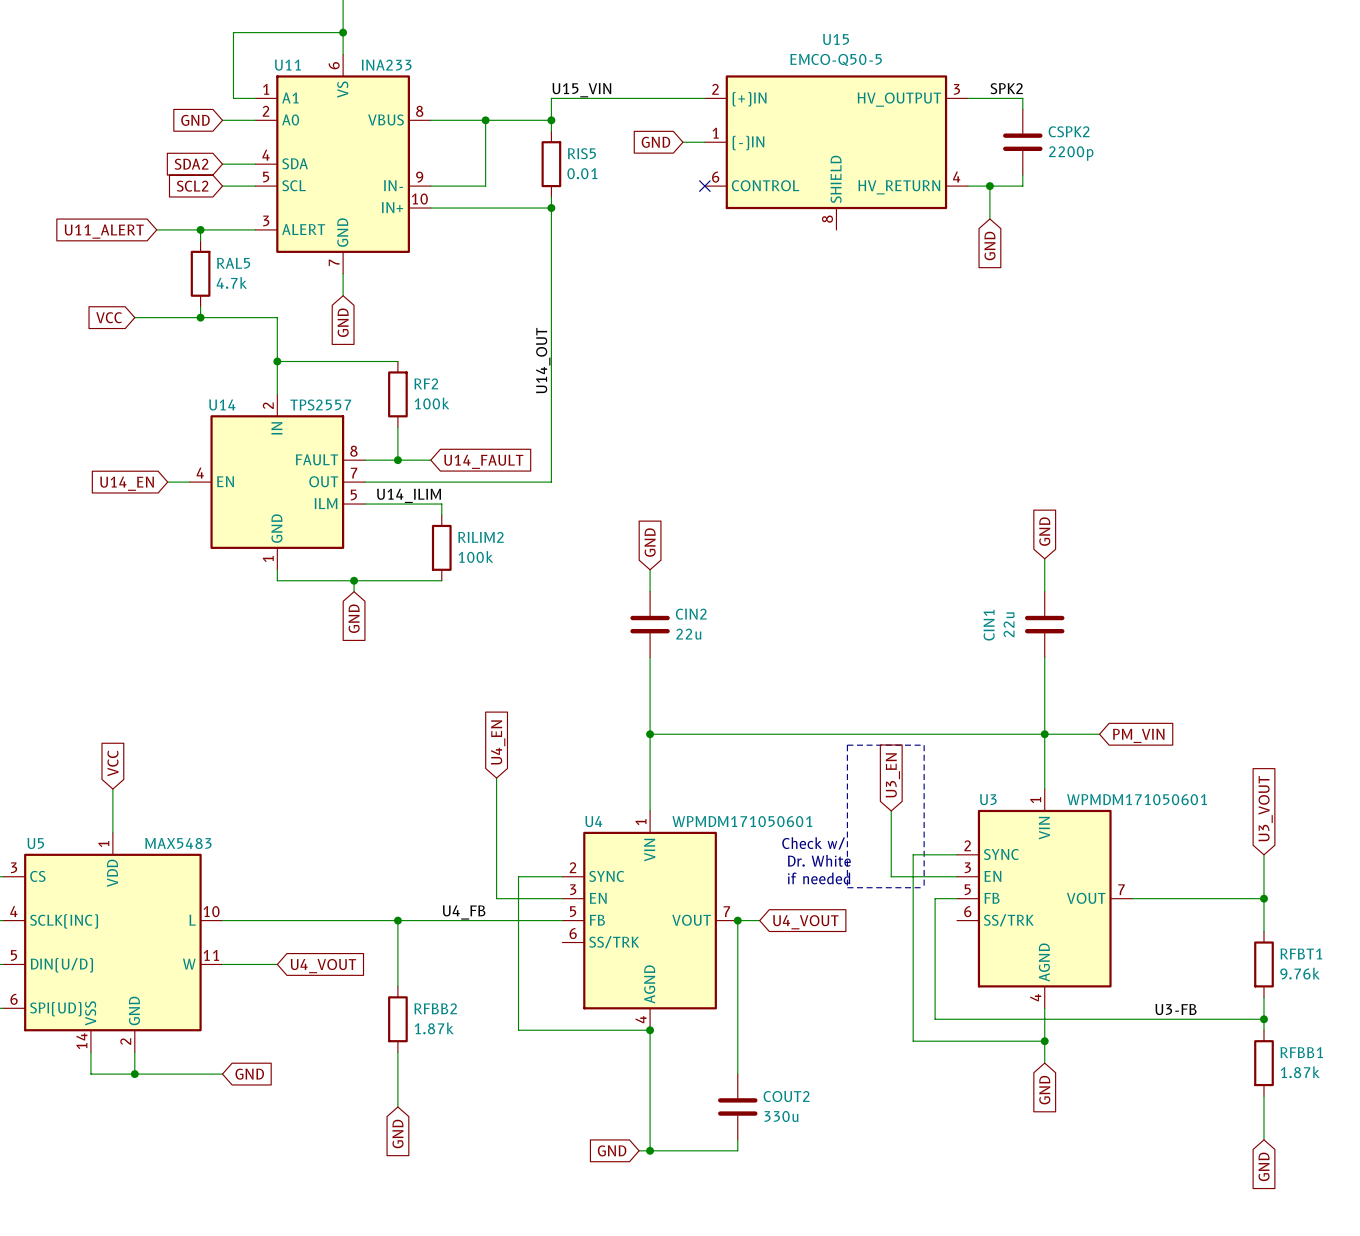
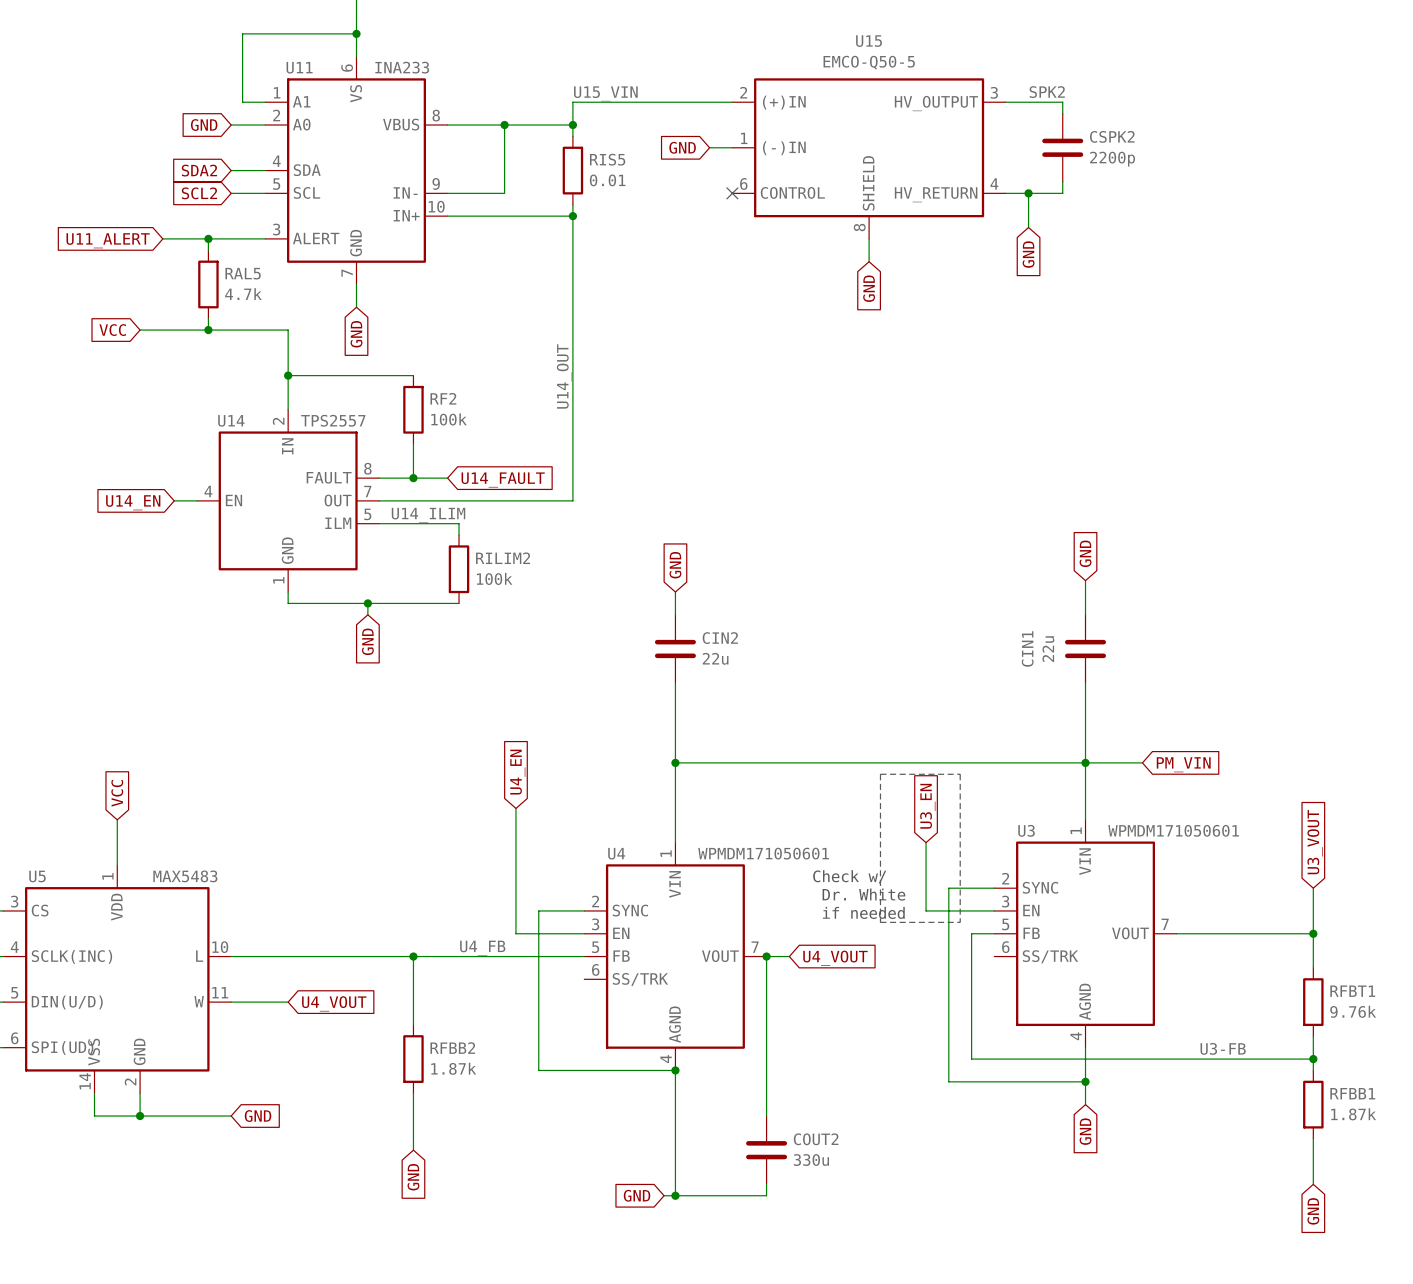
wire: none -> (869, 238) (869, 261)
global label: none -> GND (869, 288)

